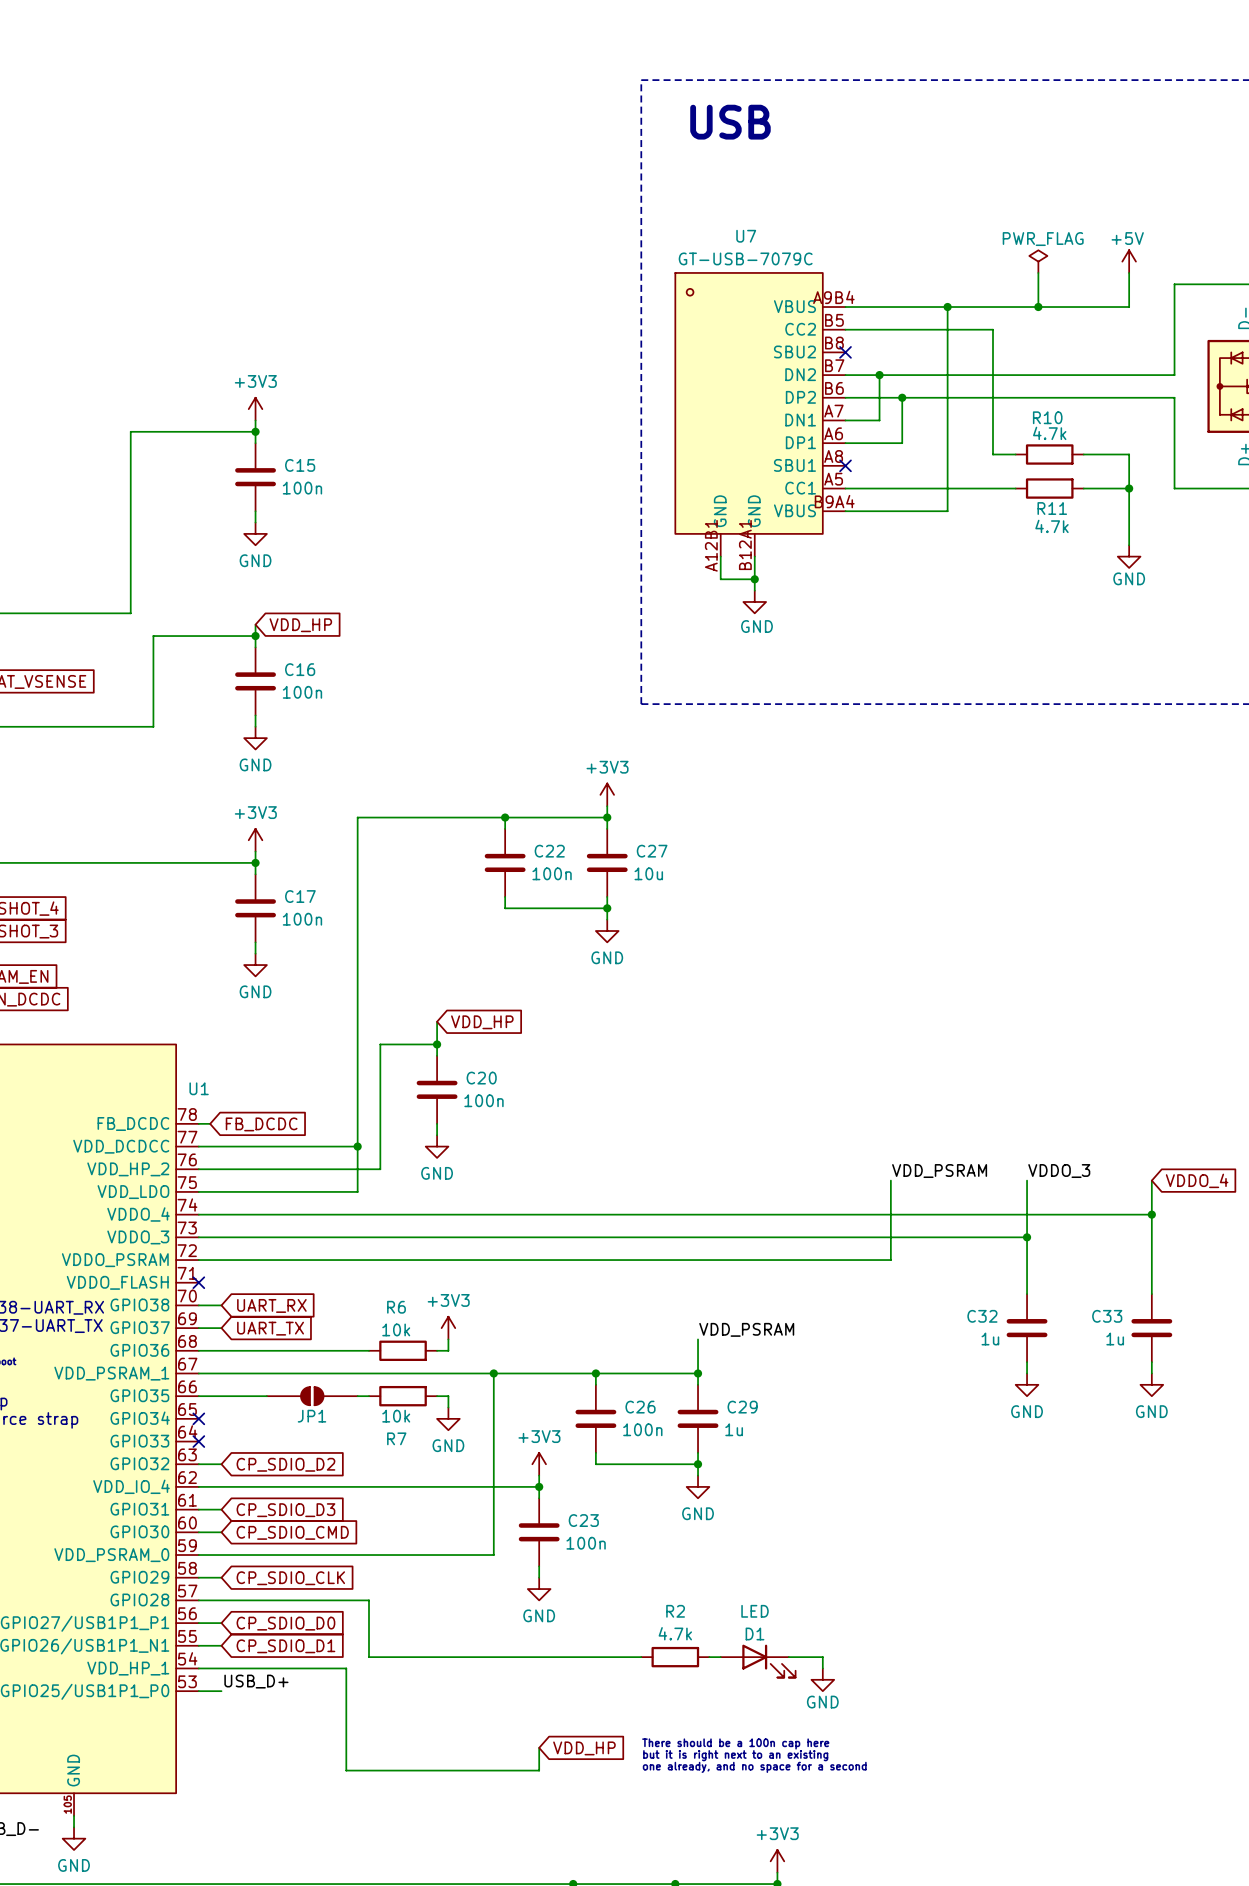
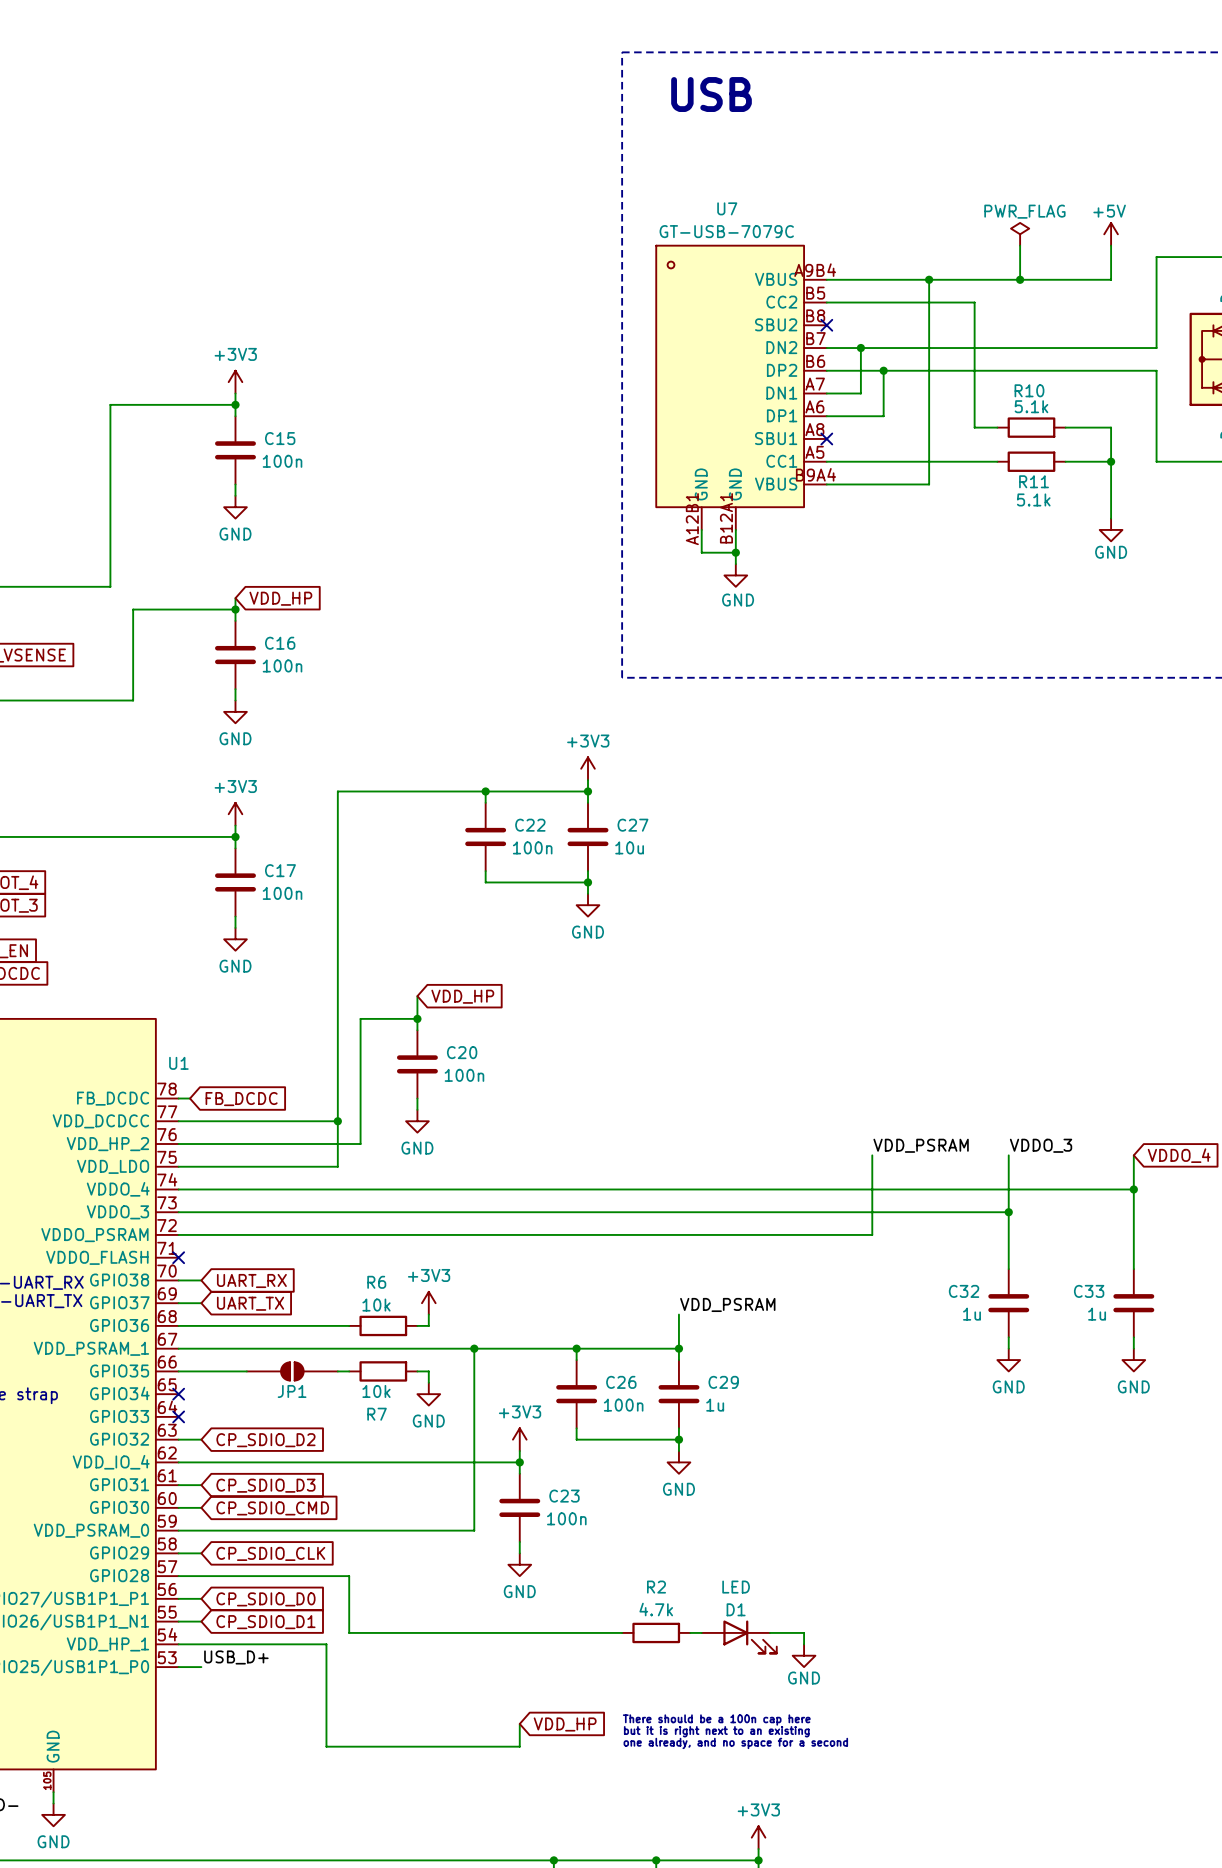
R10 value: 4.7k (1049, 433) -> 5.1k (1031, 406)
R11 value: 4.7k (1051, 526) -> 5.1k (1033, 499)

